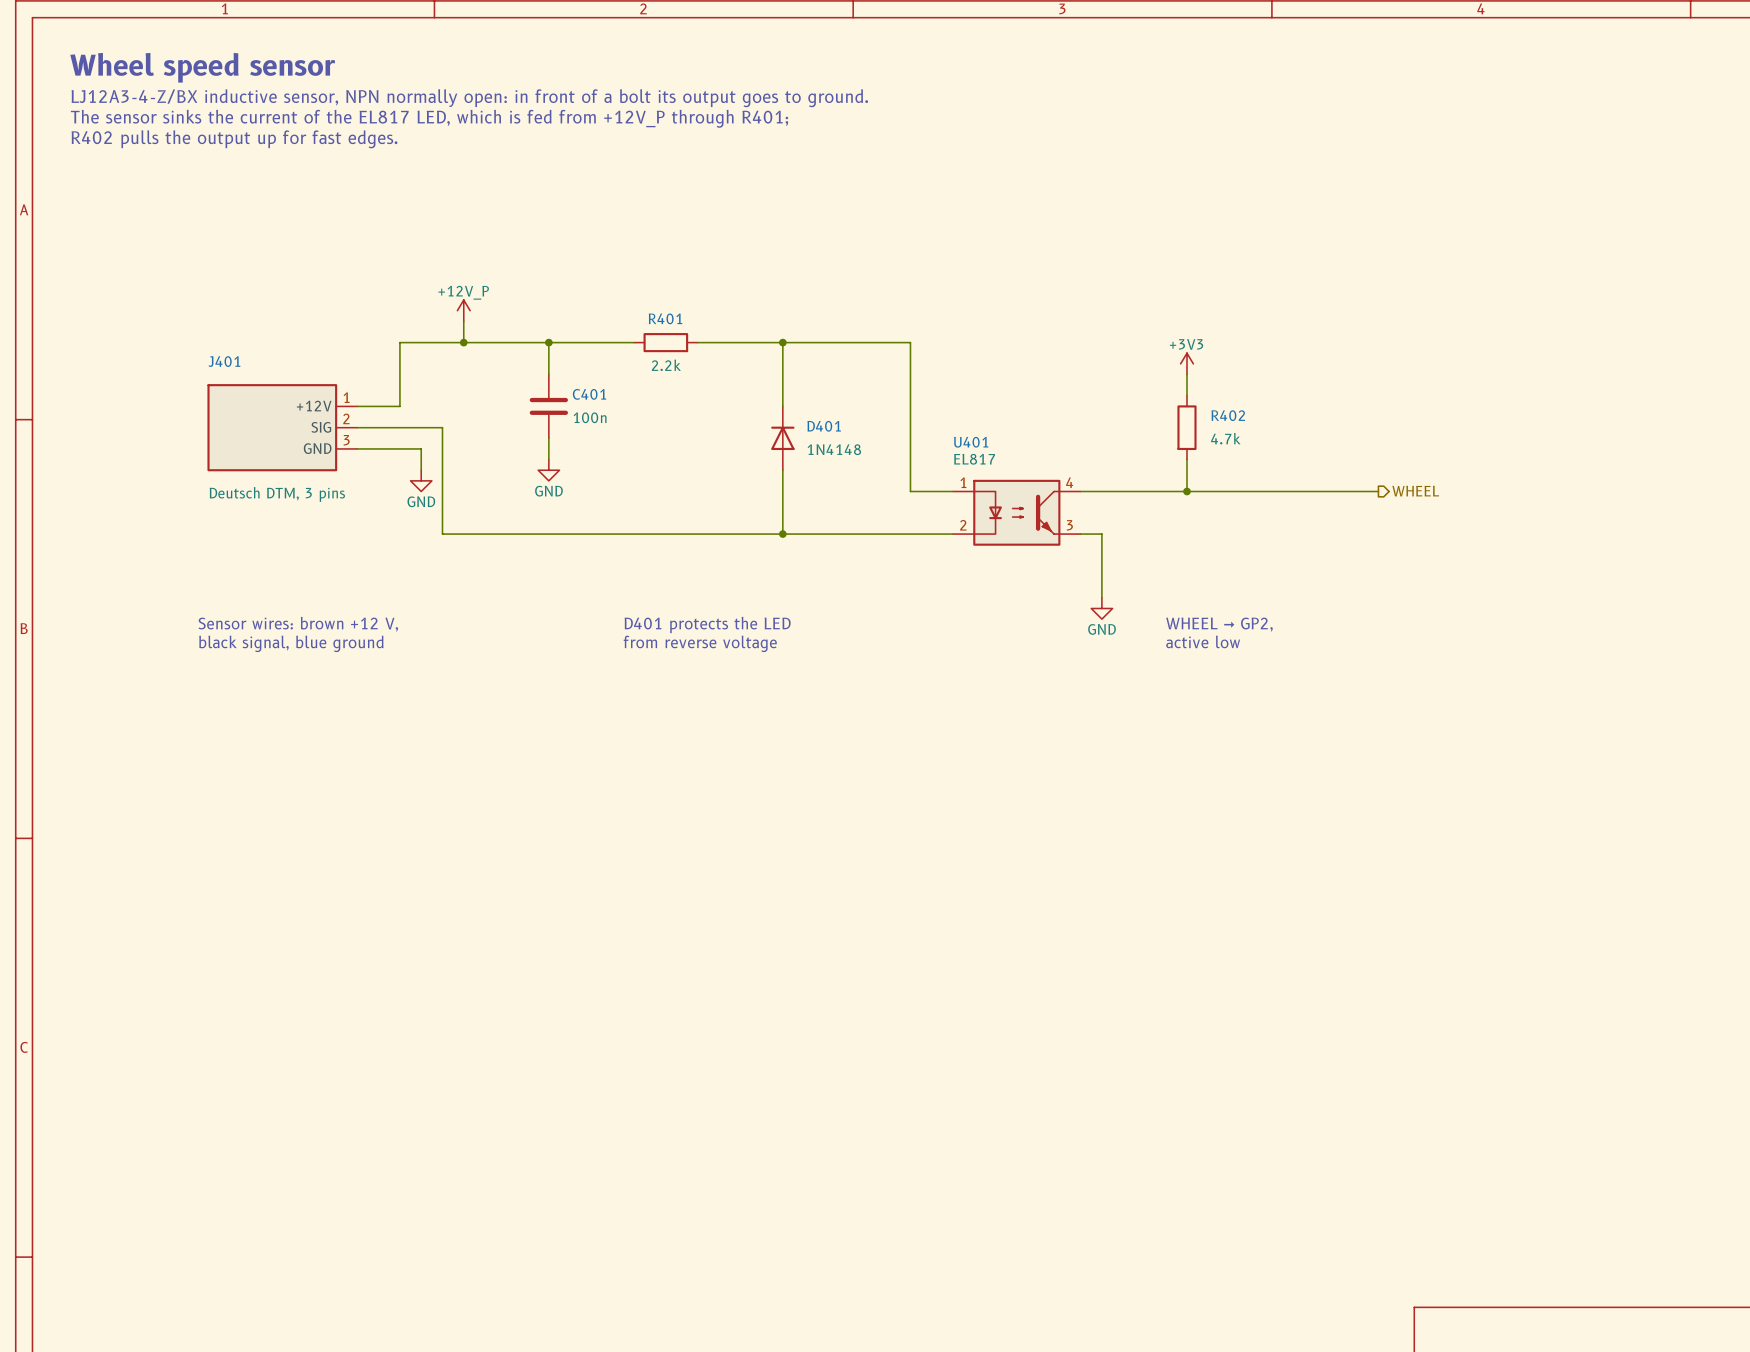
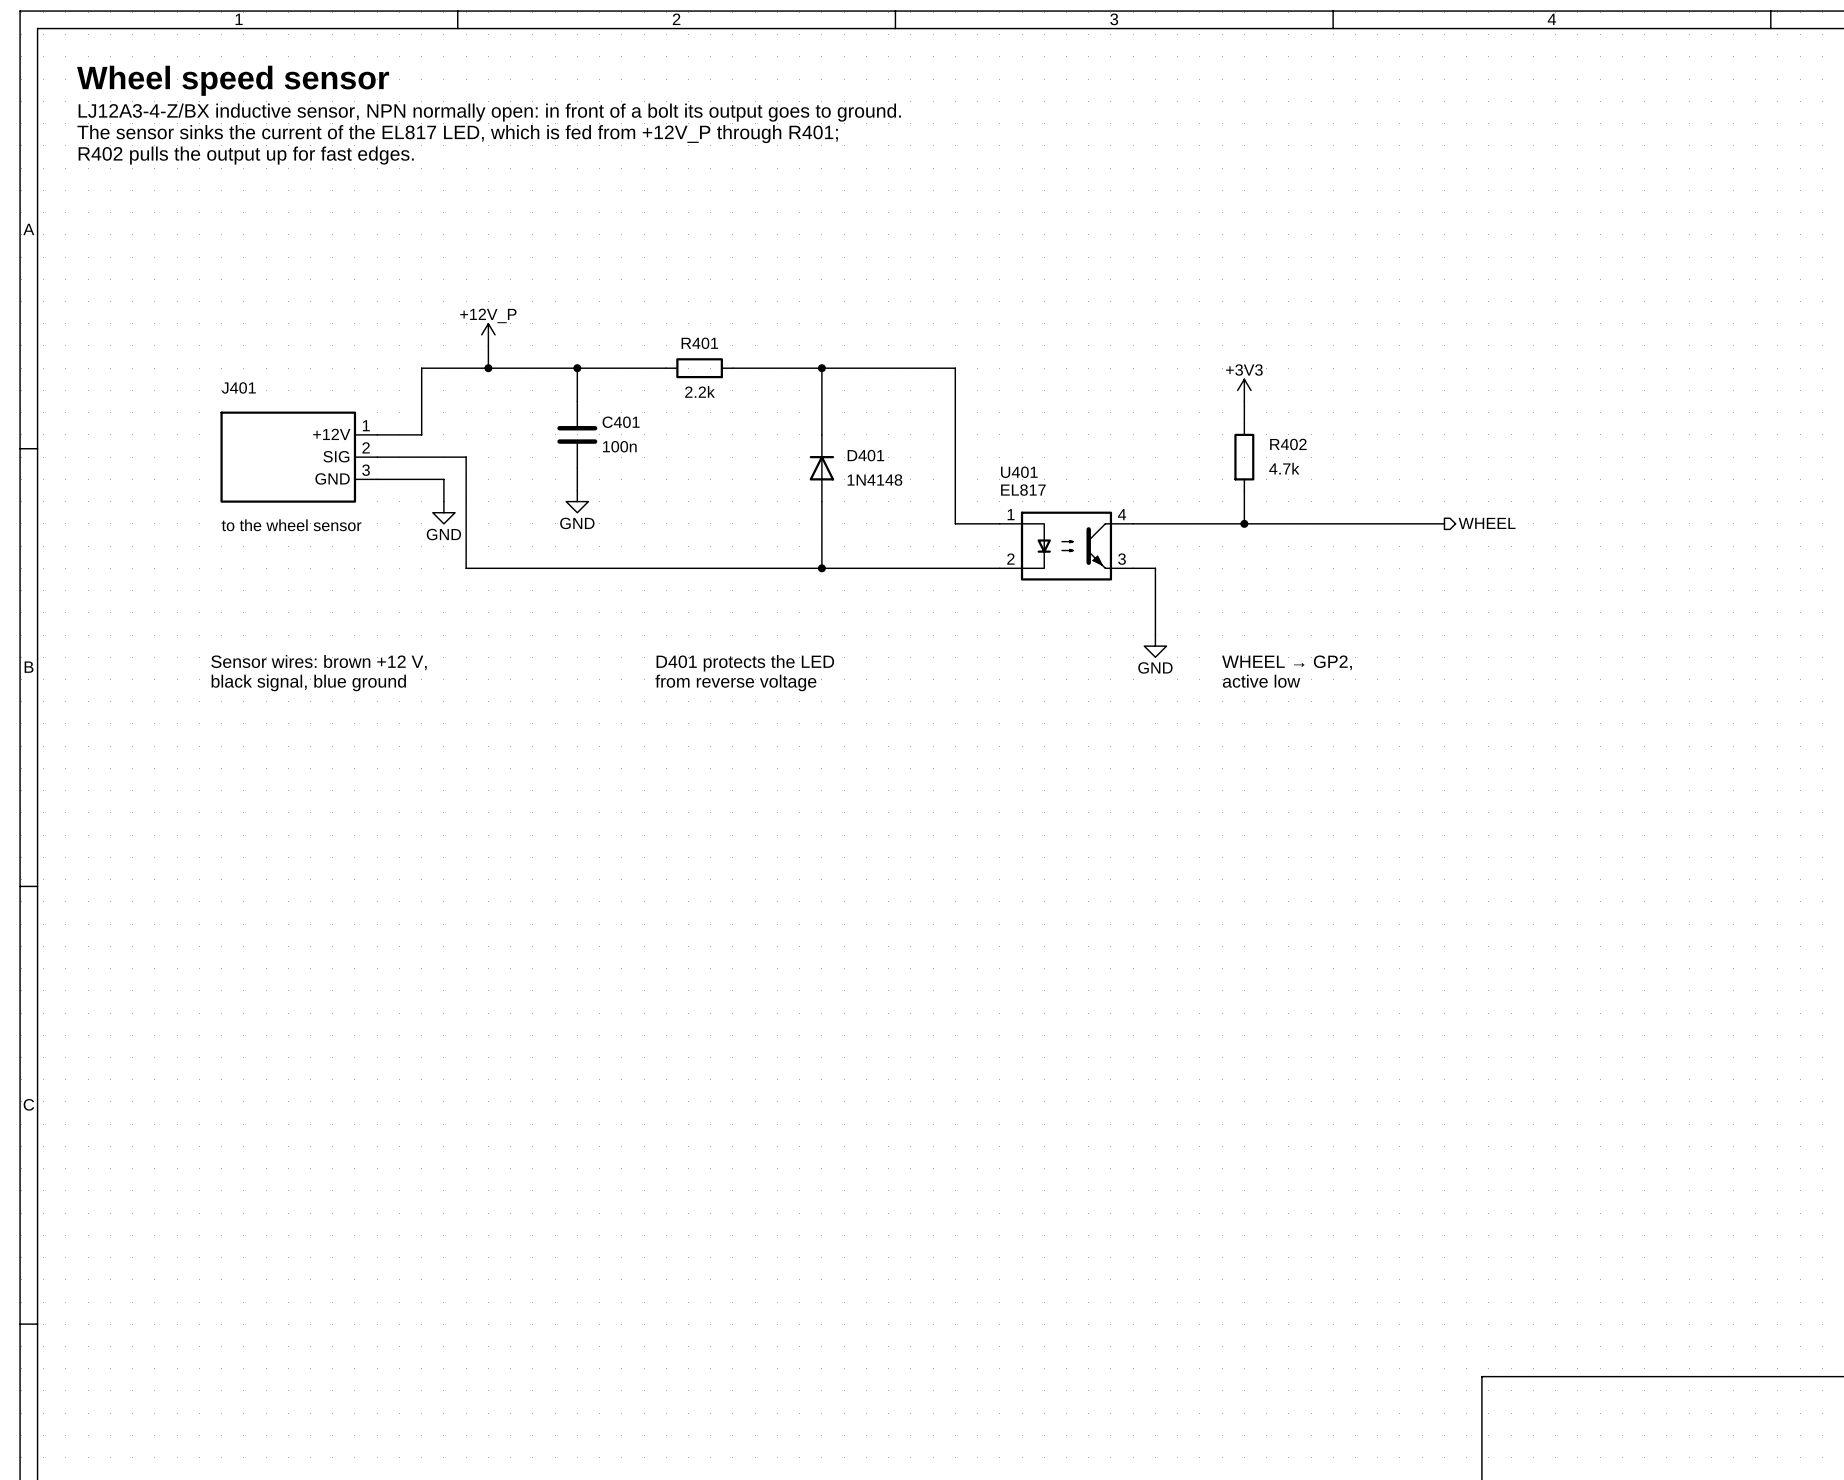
J401 value: Deutsch DTM, 3 pins (277, 494) -> to the wheel sensor (291, 525)

